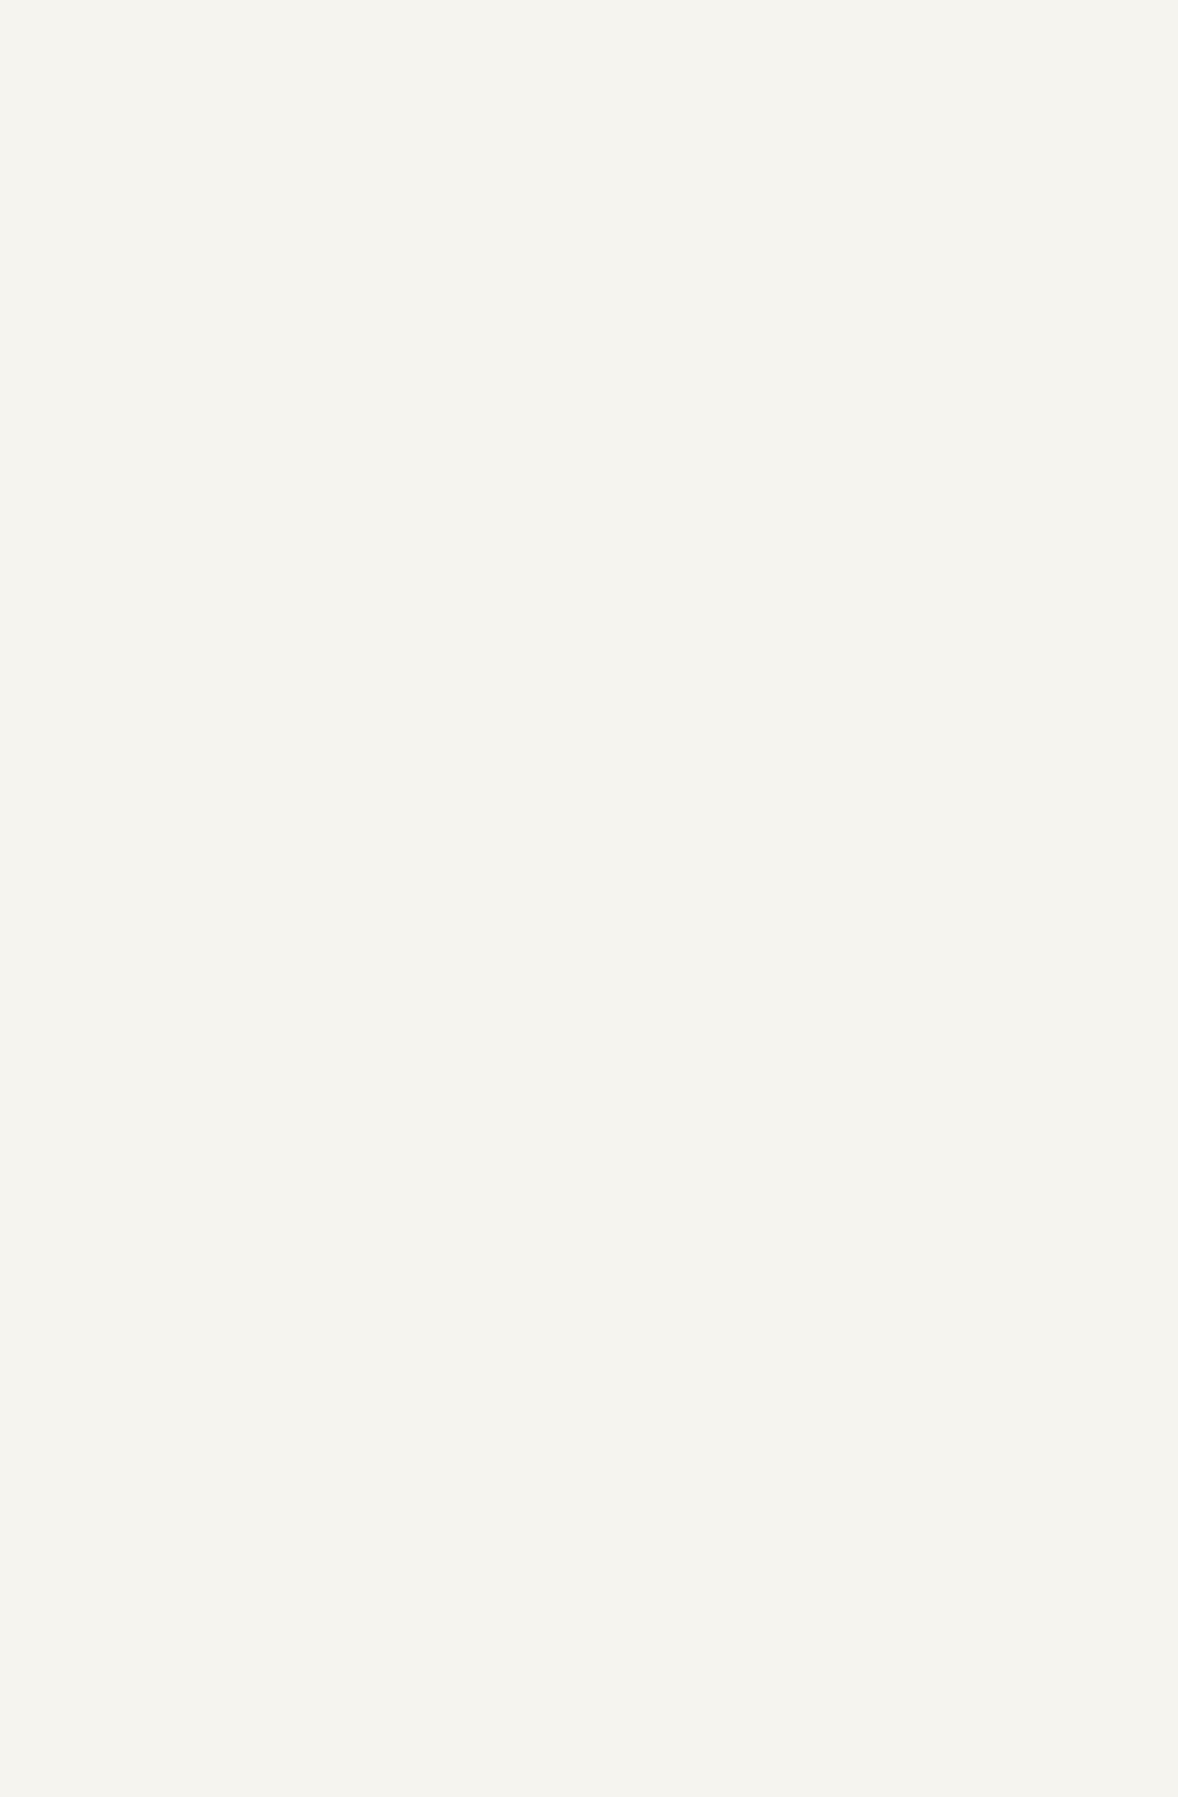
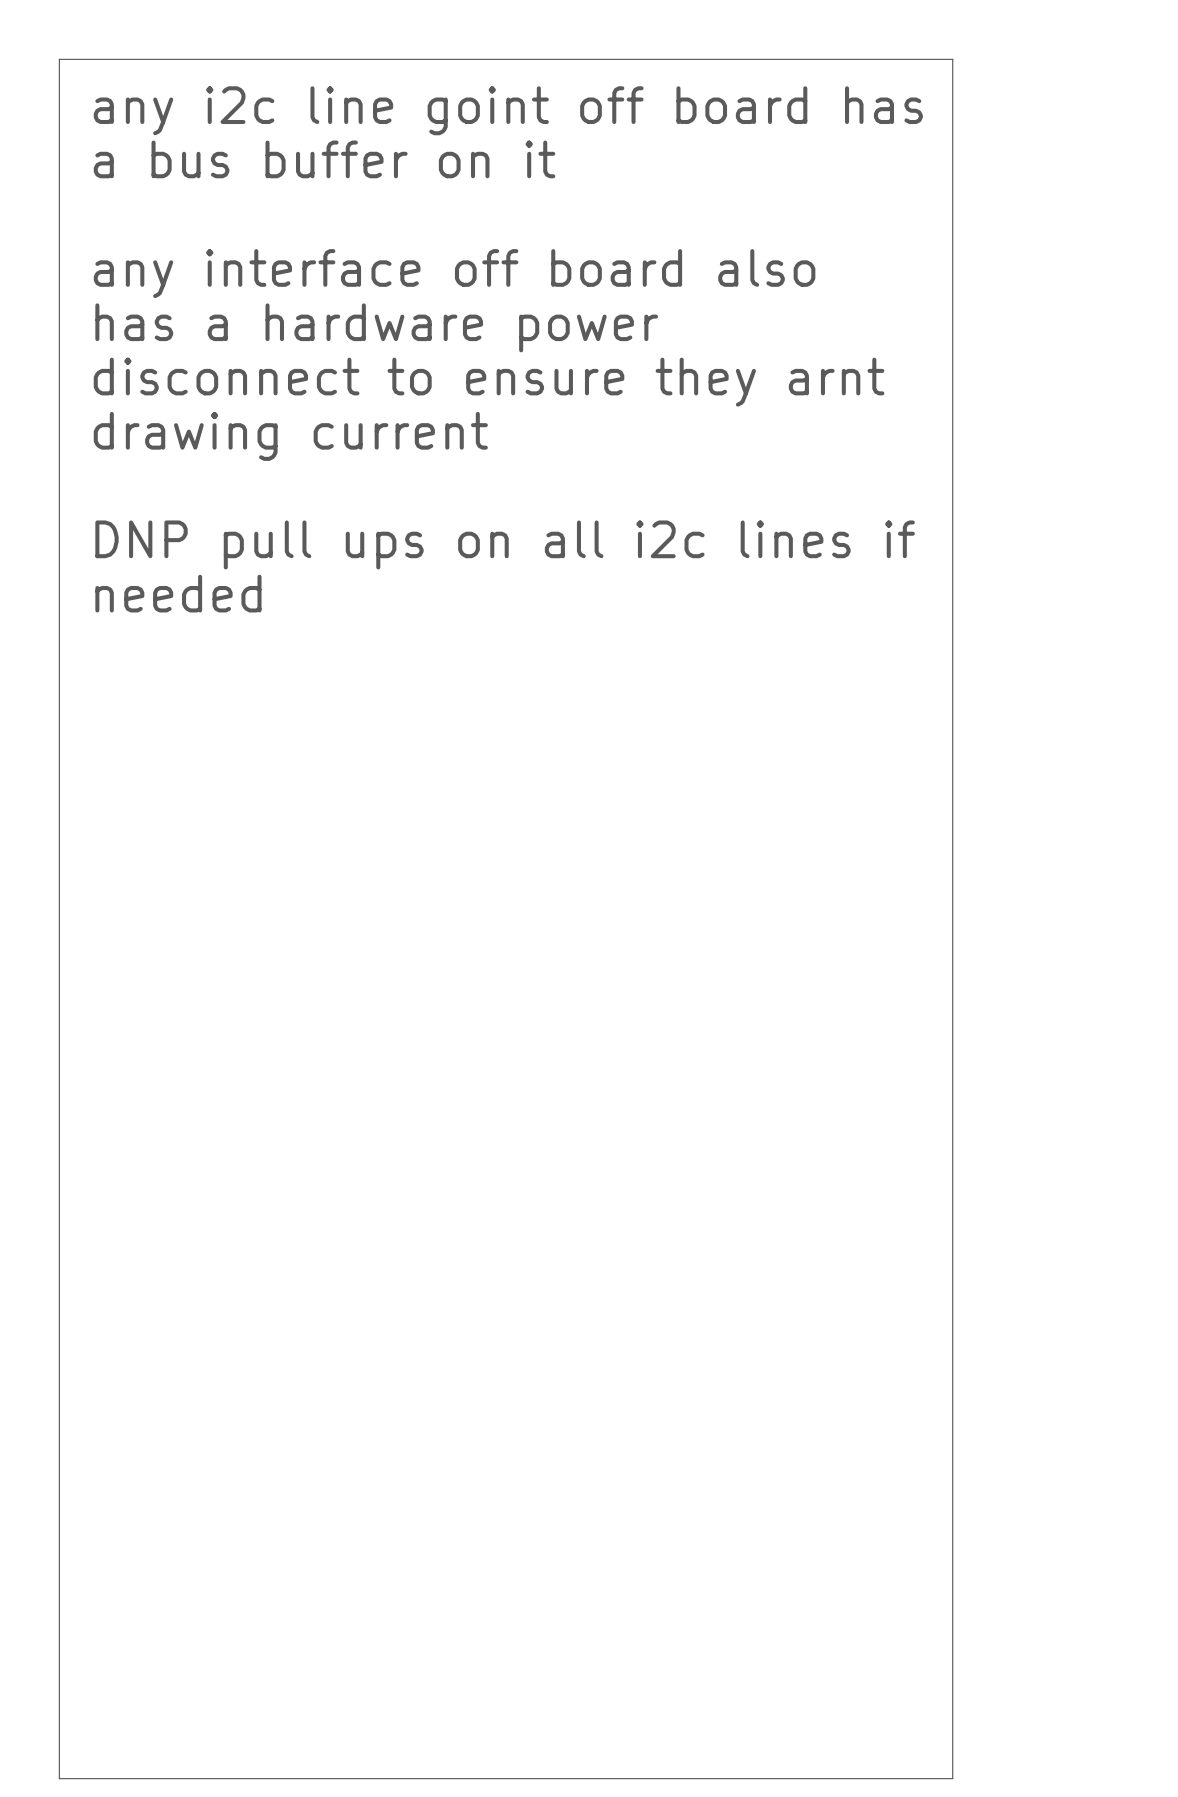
line: none -> (59, 59) (952, 59) (952, 1778) (59, 1778) (59, 59)
text: none -> any i2c line goint off board has (508, 110)
text: none -> a bus buffer on it (324, 159)
text: none -> any interface off board also (454, 273)
text: none -> has a hardware power (376, 327)
text: none -> disconnect to ensure they arnt (489, 382)
text: none -> drawing current (290, 436)
text: none -> DNP pull ups on all i2c lines if (505, 544)
text: none -> needed (178, 593)

